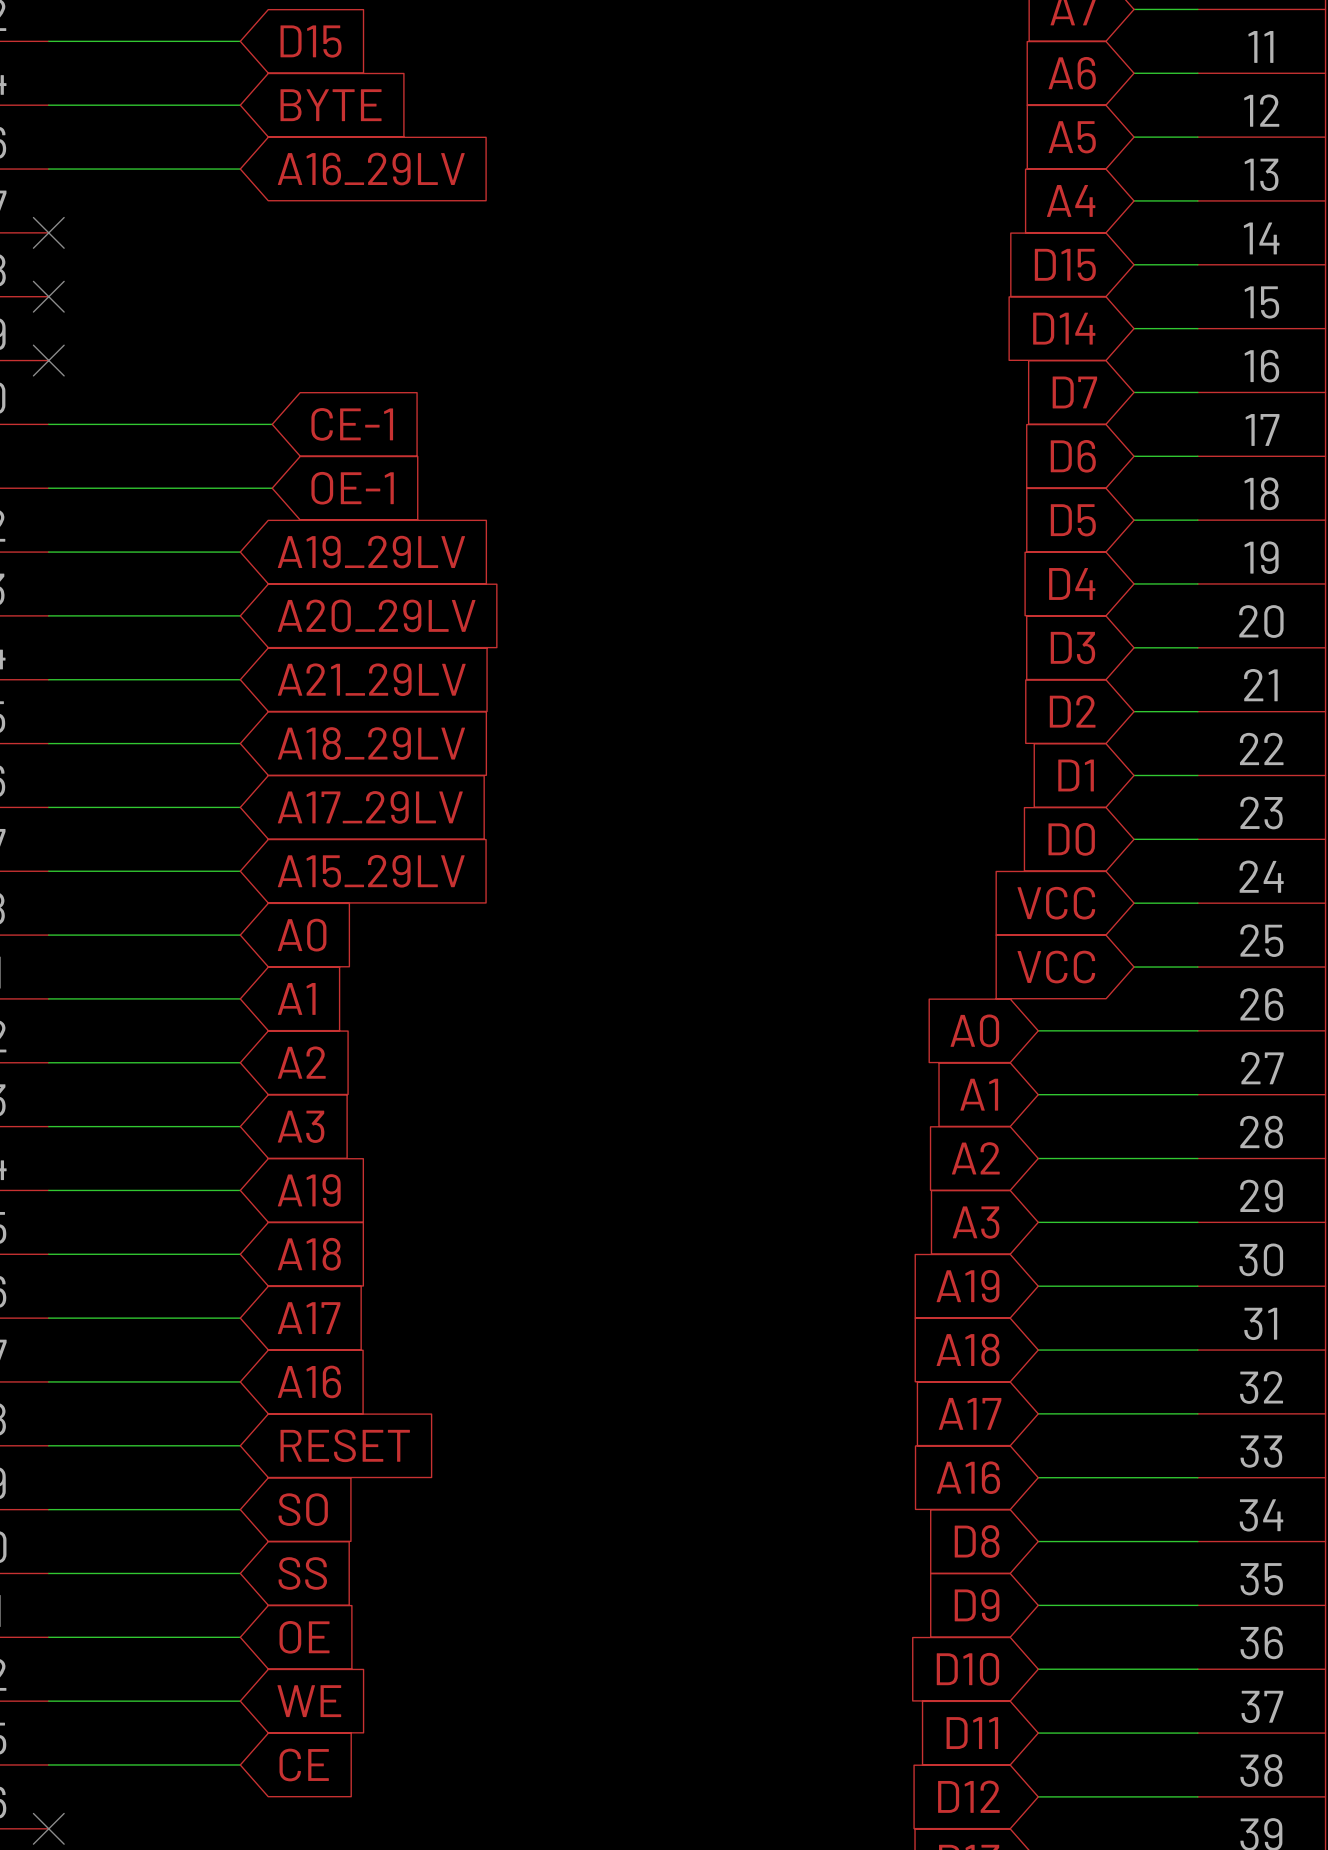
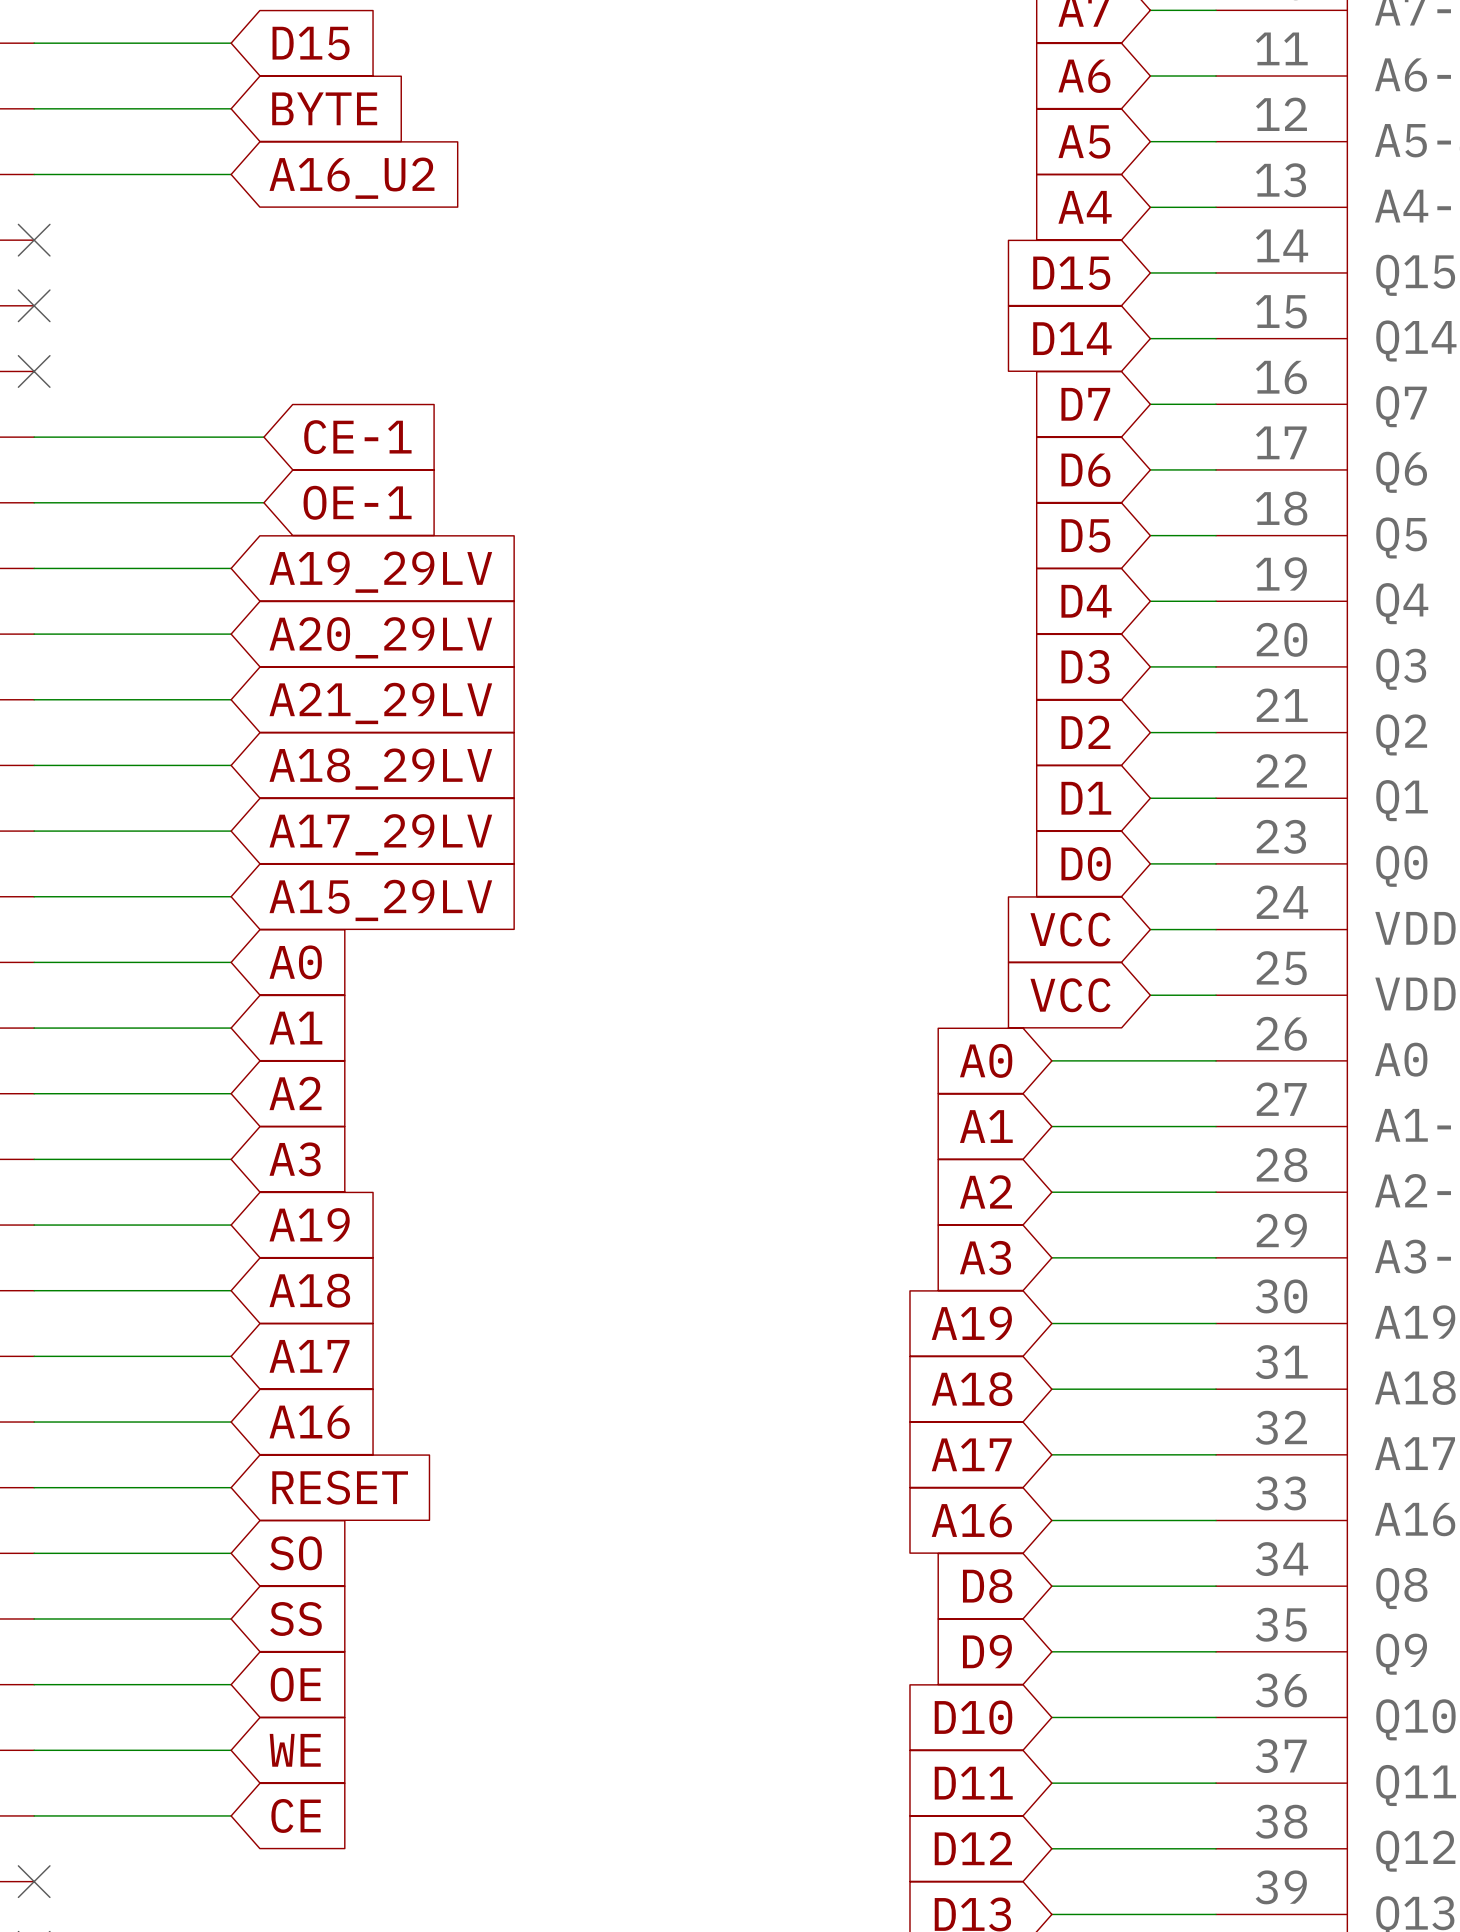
global label: A16_29LV (371, 169) -> A16_U2 (351, 178)

